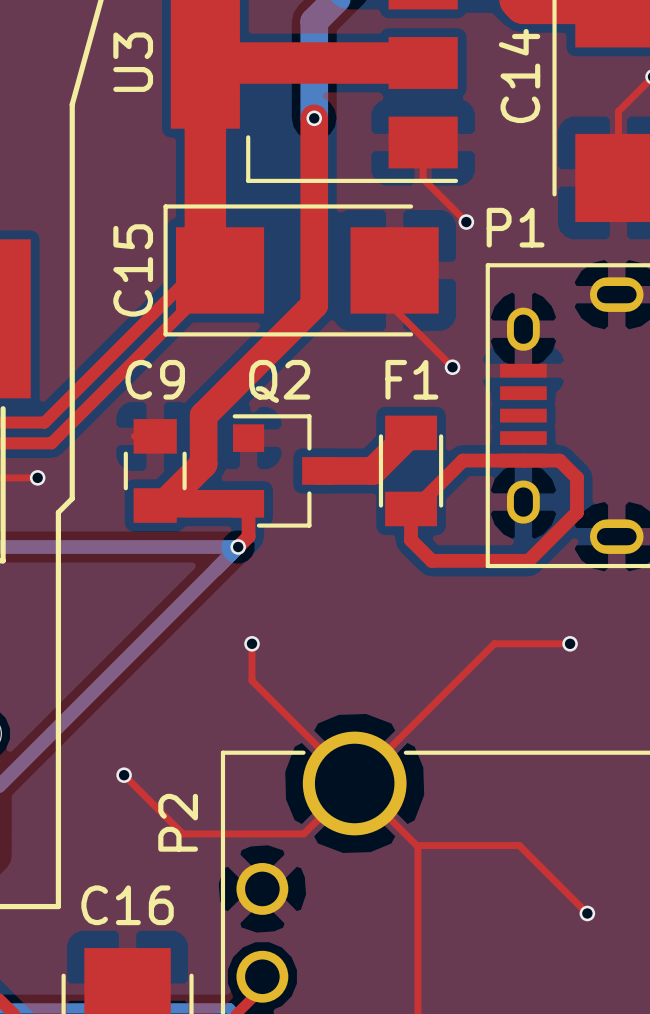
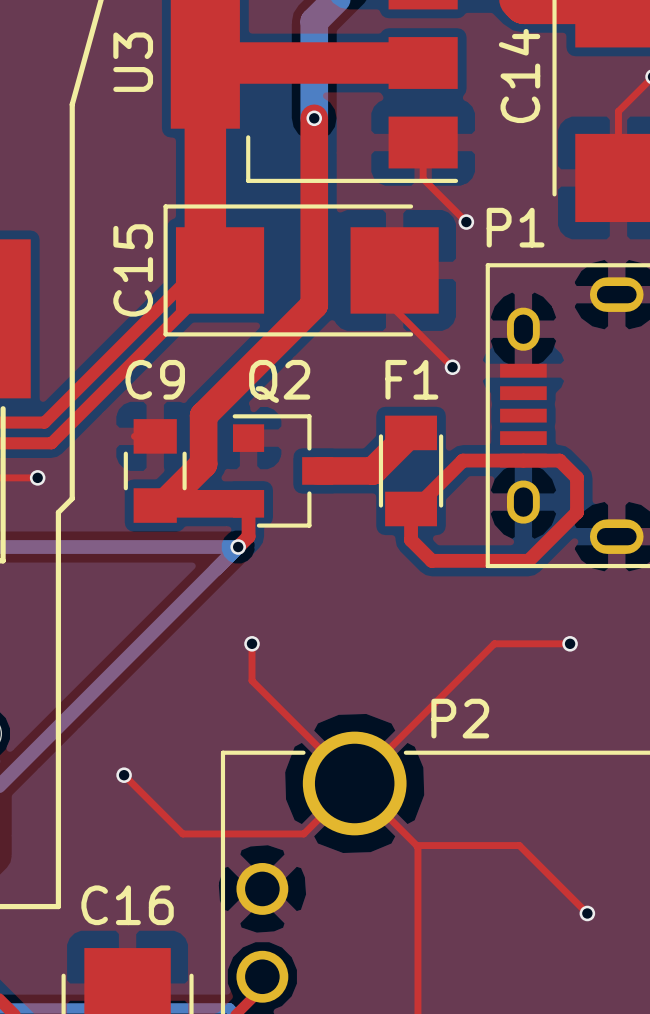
P2 name rotation: 0° (178, 822) -> 90° clockwise (460, 718)
P2 name position: P2 (178, 822) -> P2 (460, 718)

